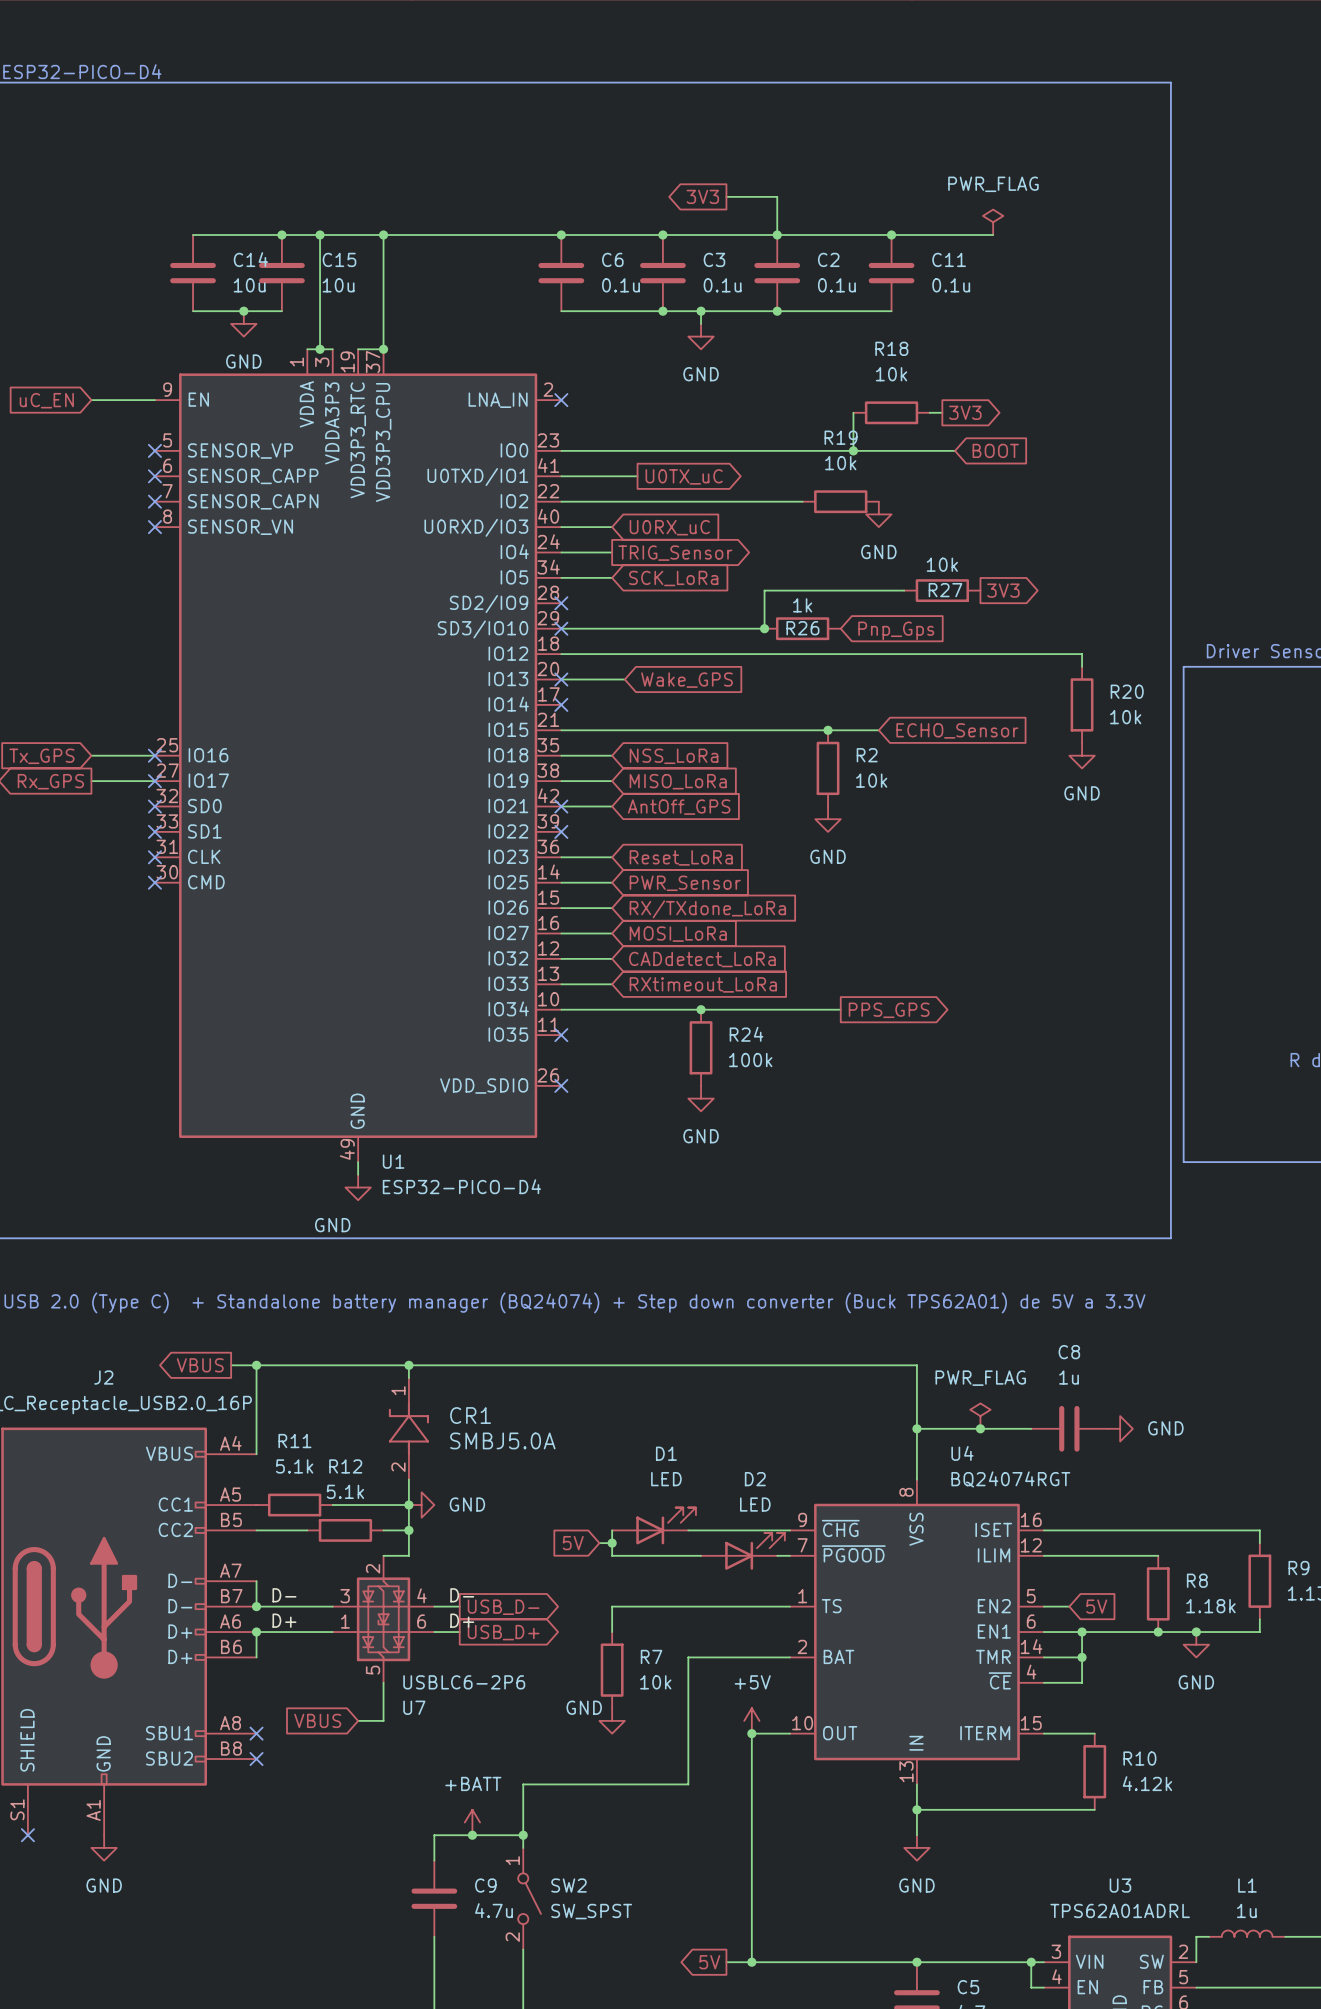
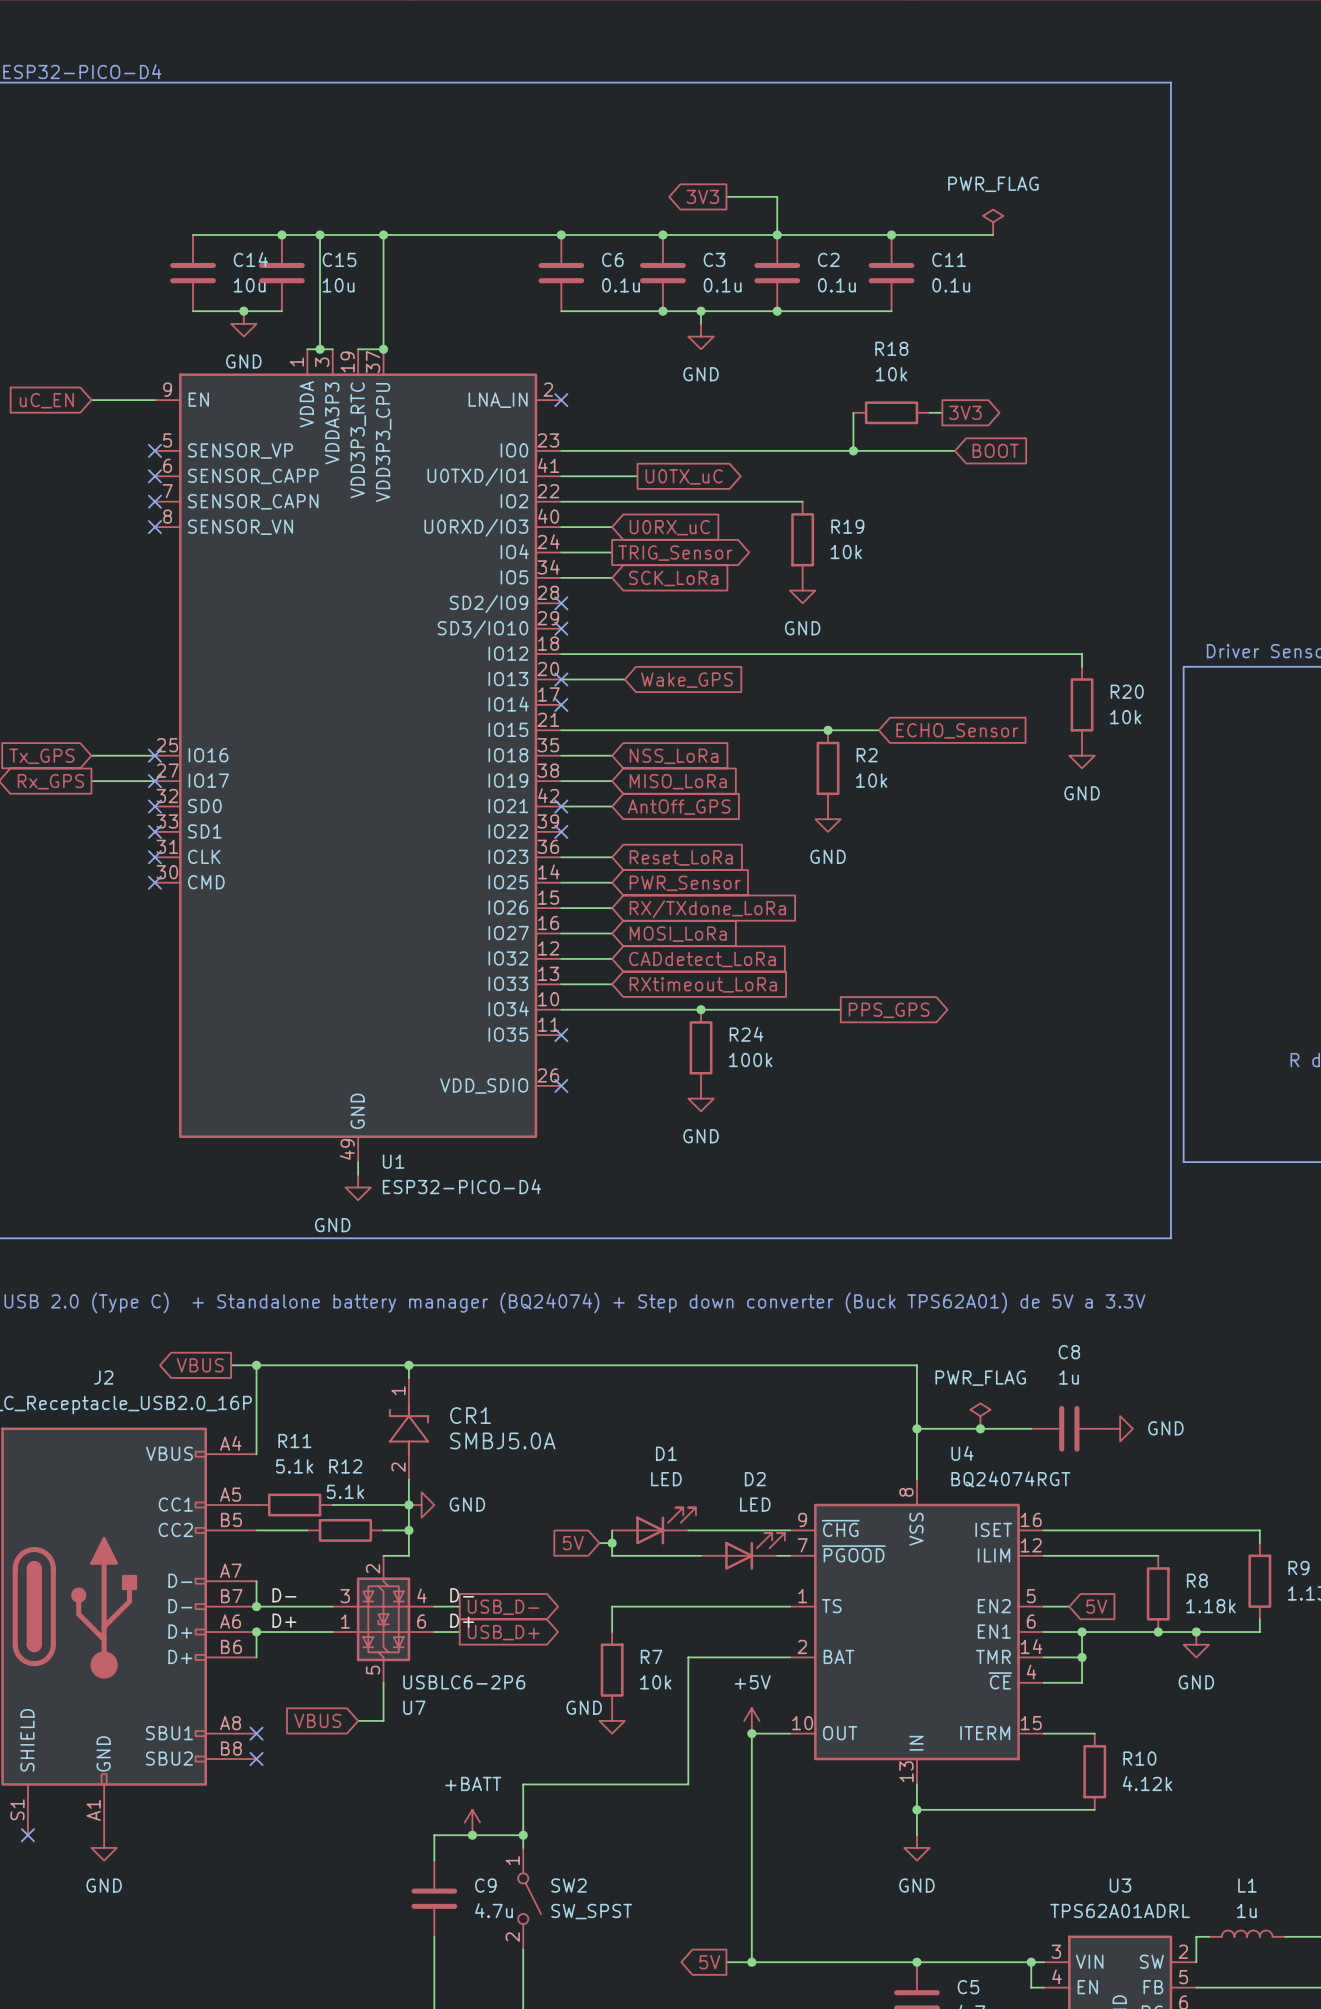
R19 name position: R19 (841, 437) -> R19 (847, 526)
R19 rotation: 0° (840, 501) -> 90° clockwise (802, 539)
R19 position: (840, 501) -> (802, 539)
power symbol position: GND (878, 514) -> GND (802, 590)
wire: (904, 590) (764, 590) (764, 628) (561, 628) -> none
R27: 10k (942, 590) -> none
global label: 3V3 (1003, 590) -> none
junction: (764, 628) -> none
R26: 1k (802, 628) -> none
global label: Pnp_Gps (896, 630) -> none

